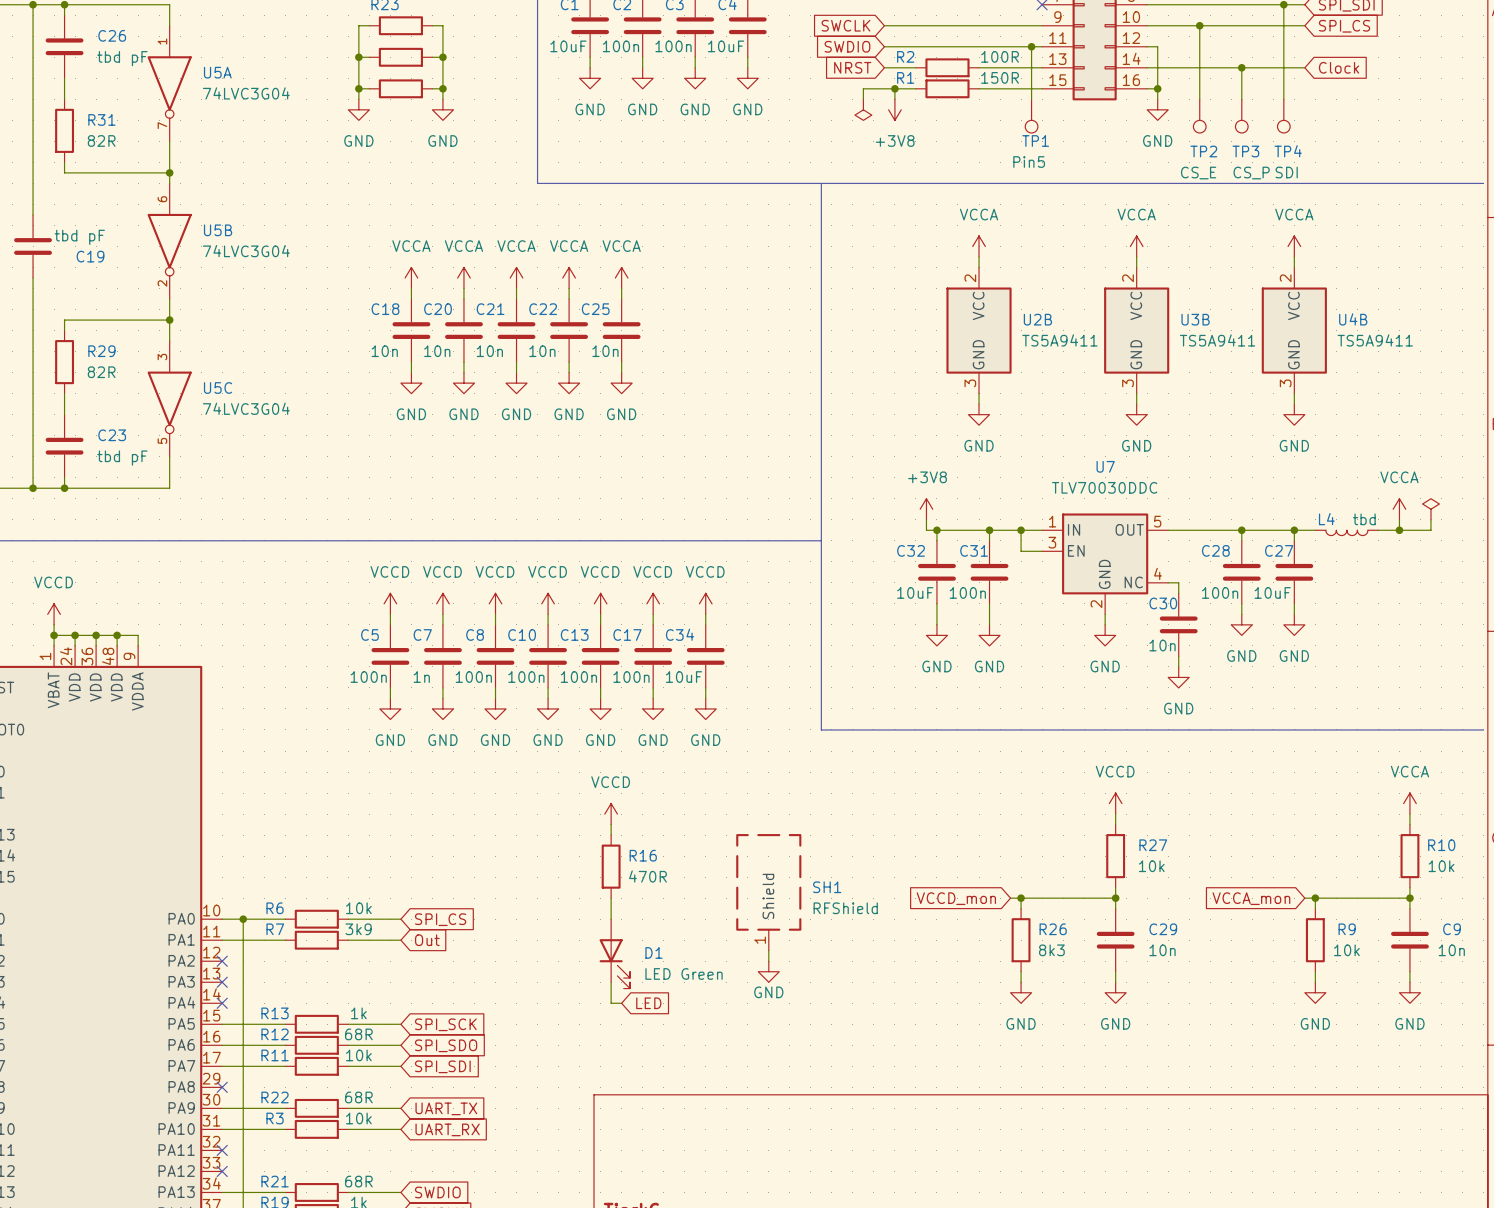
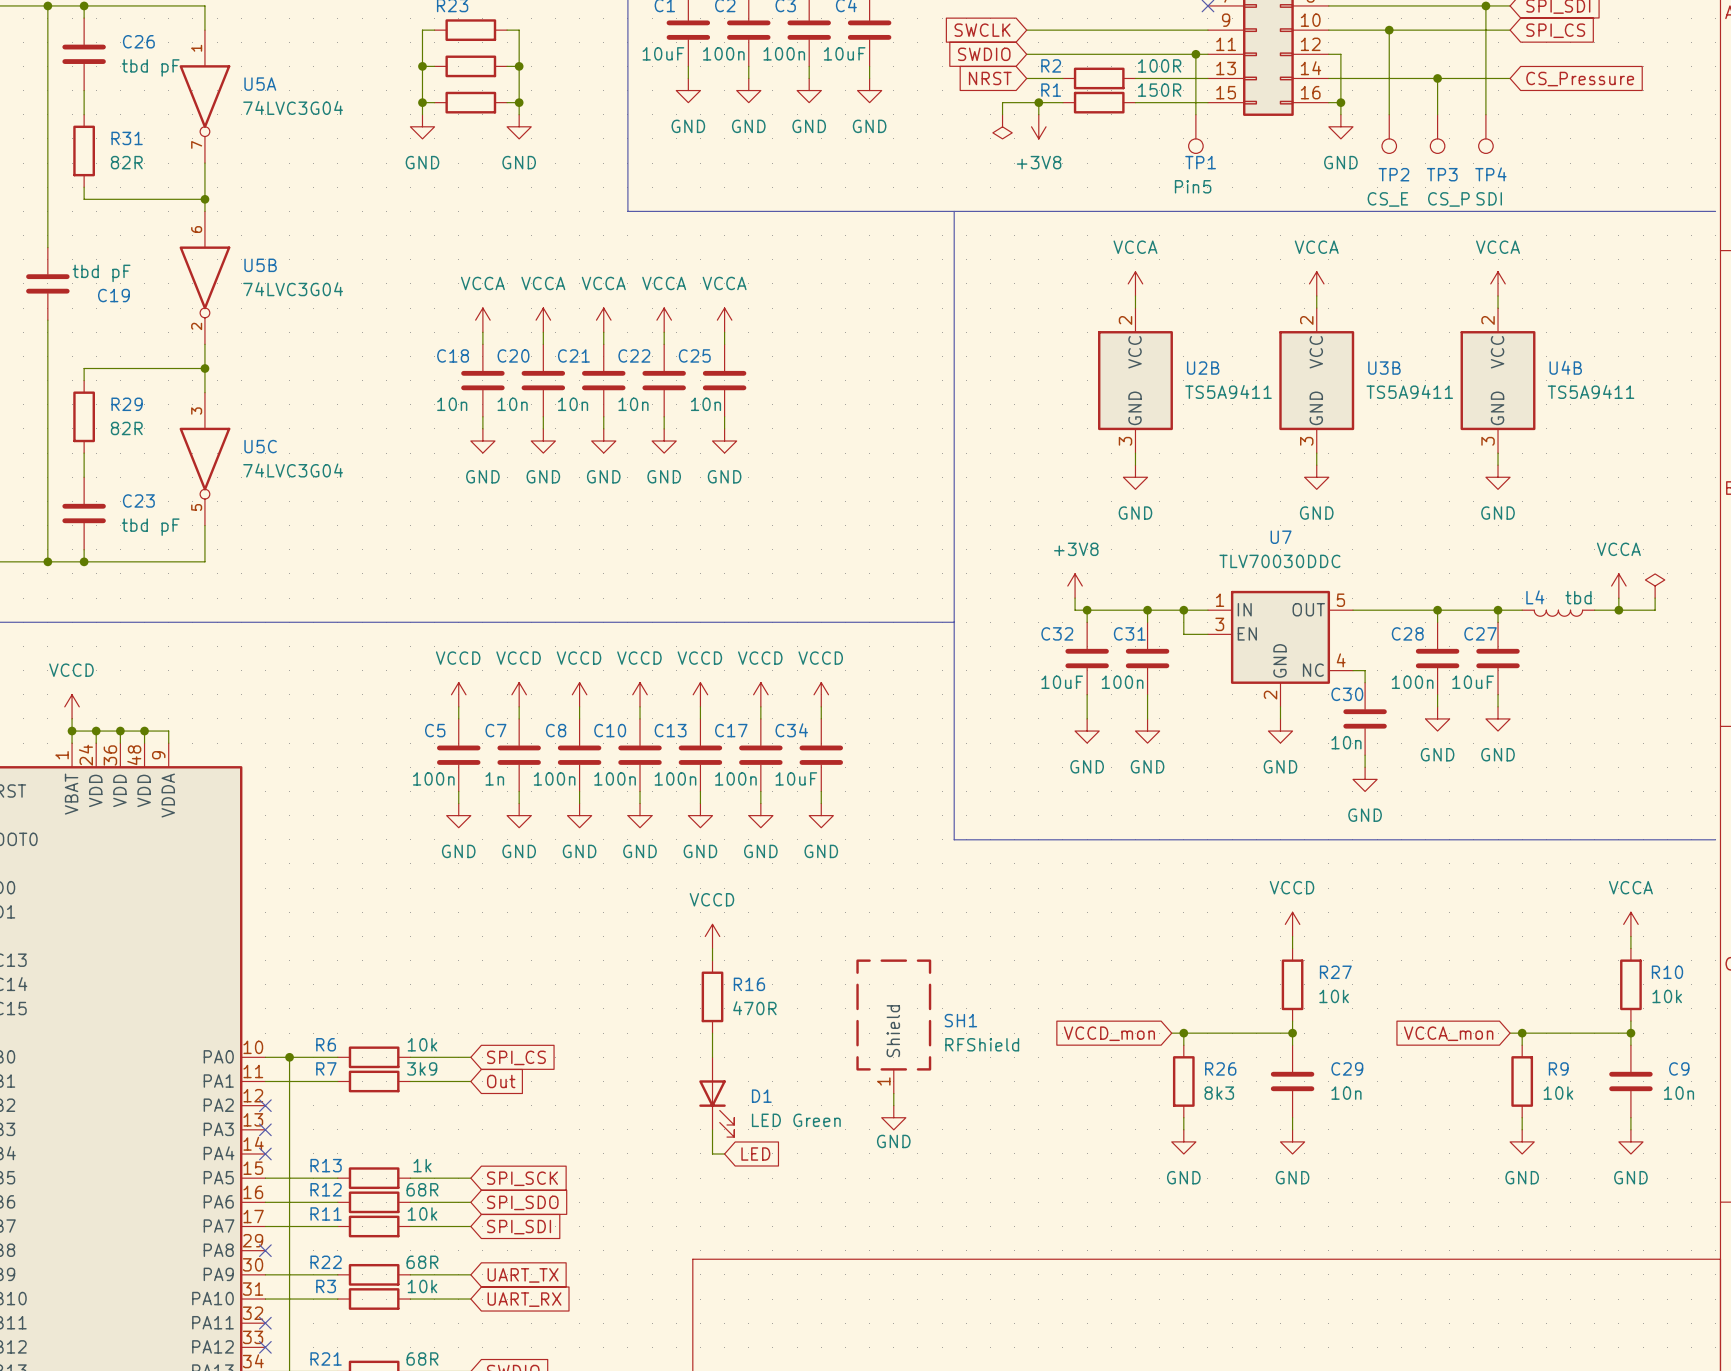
global label: Clock (1339, 67) -> CS_Pressure (1580, 79)

